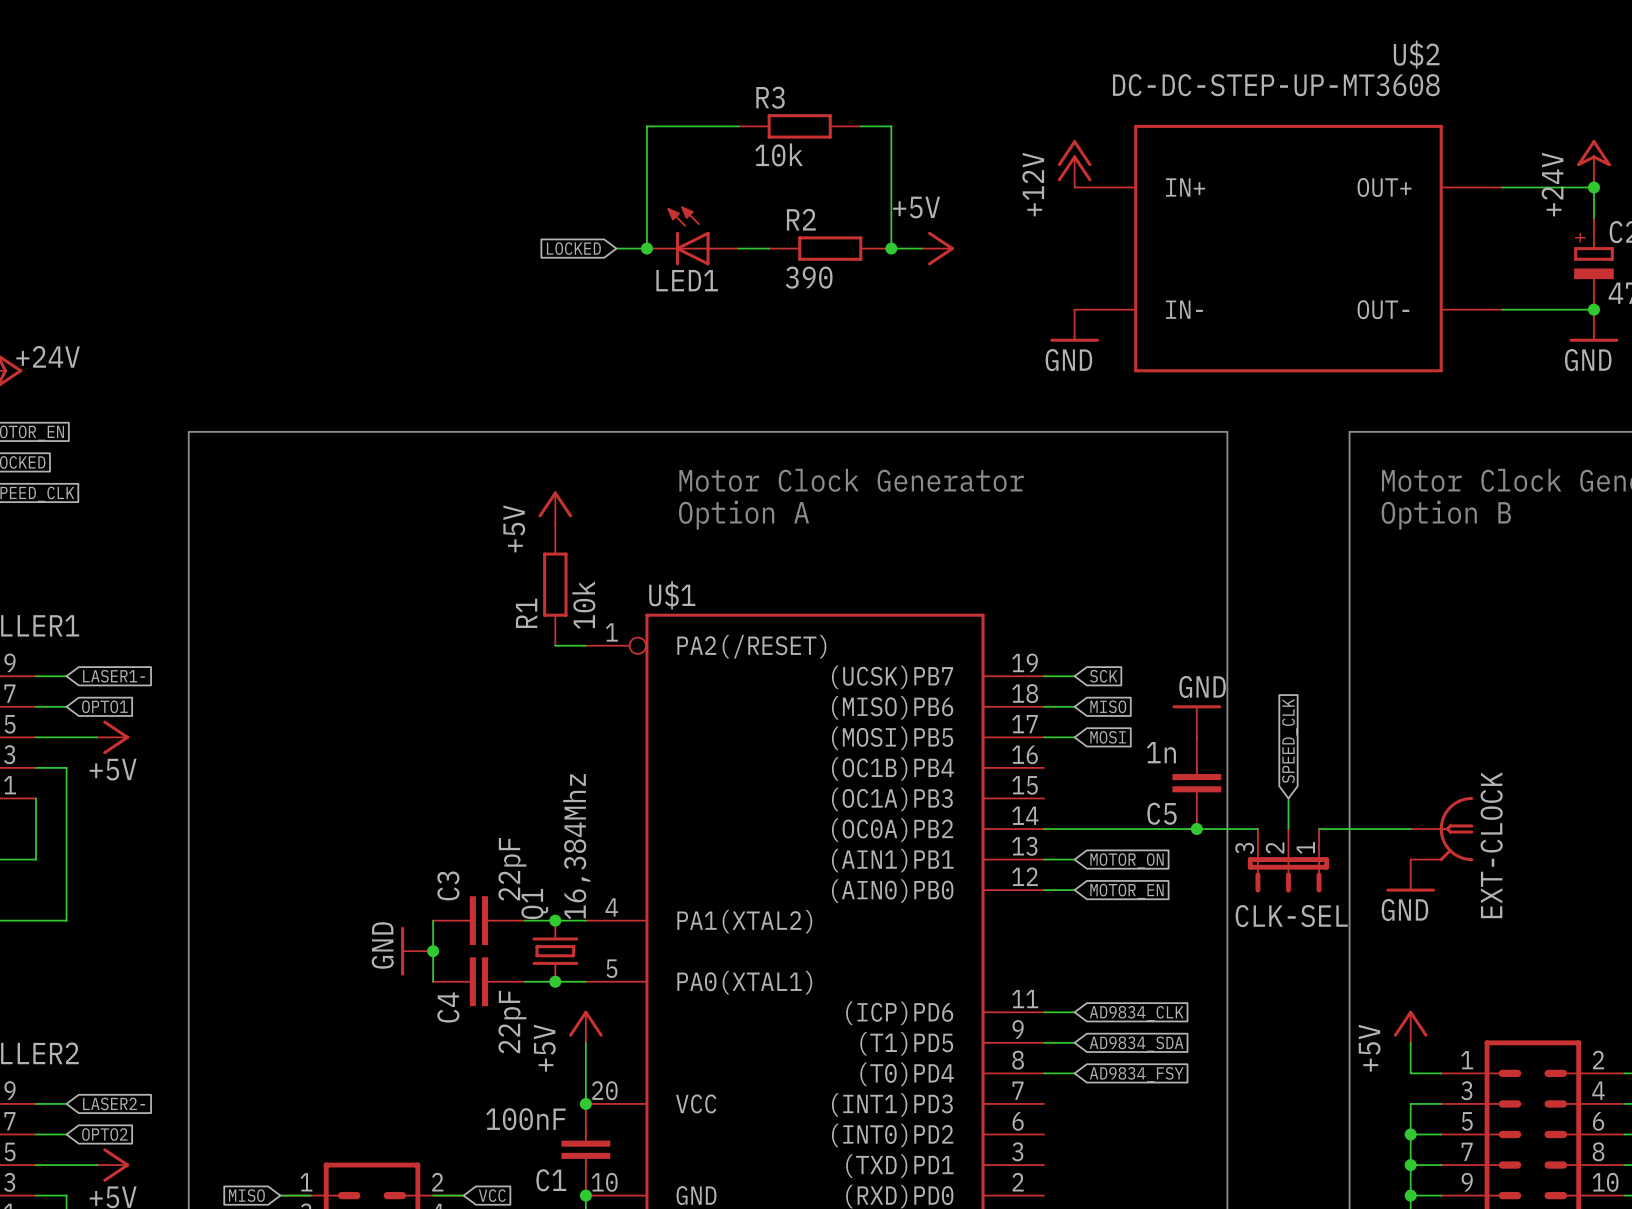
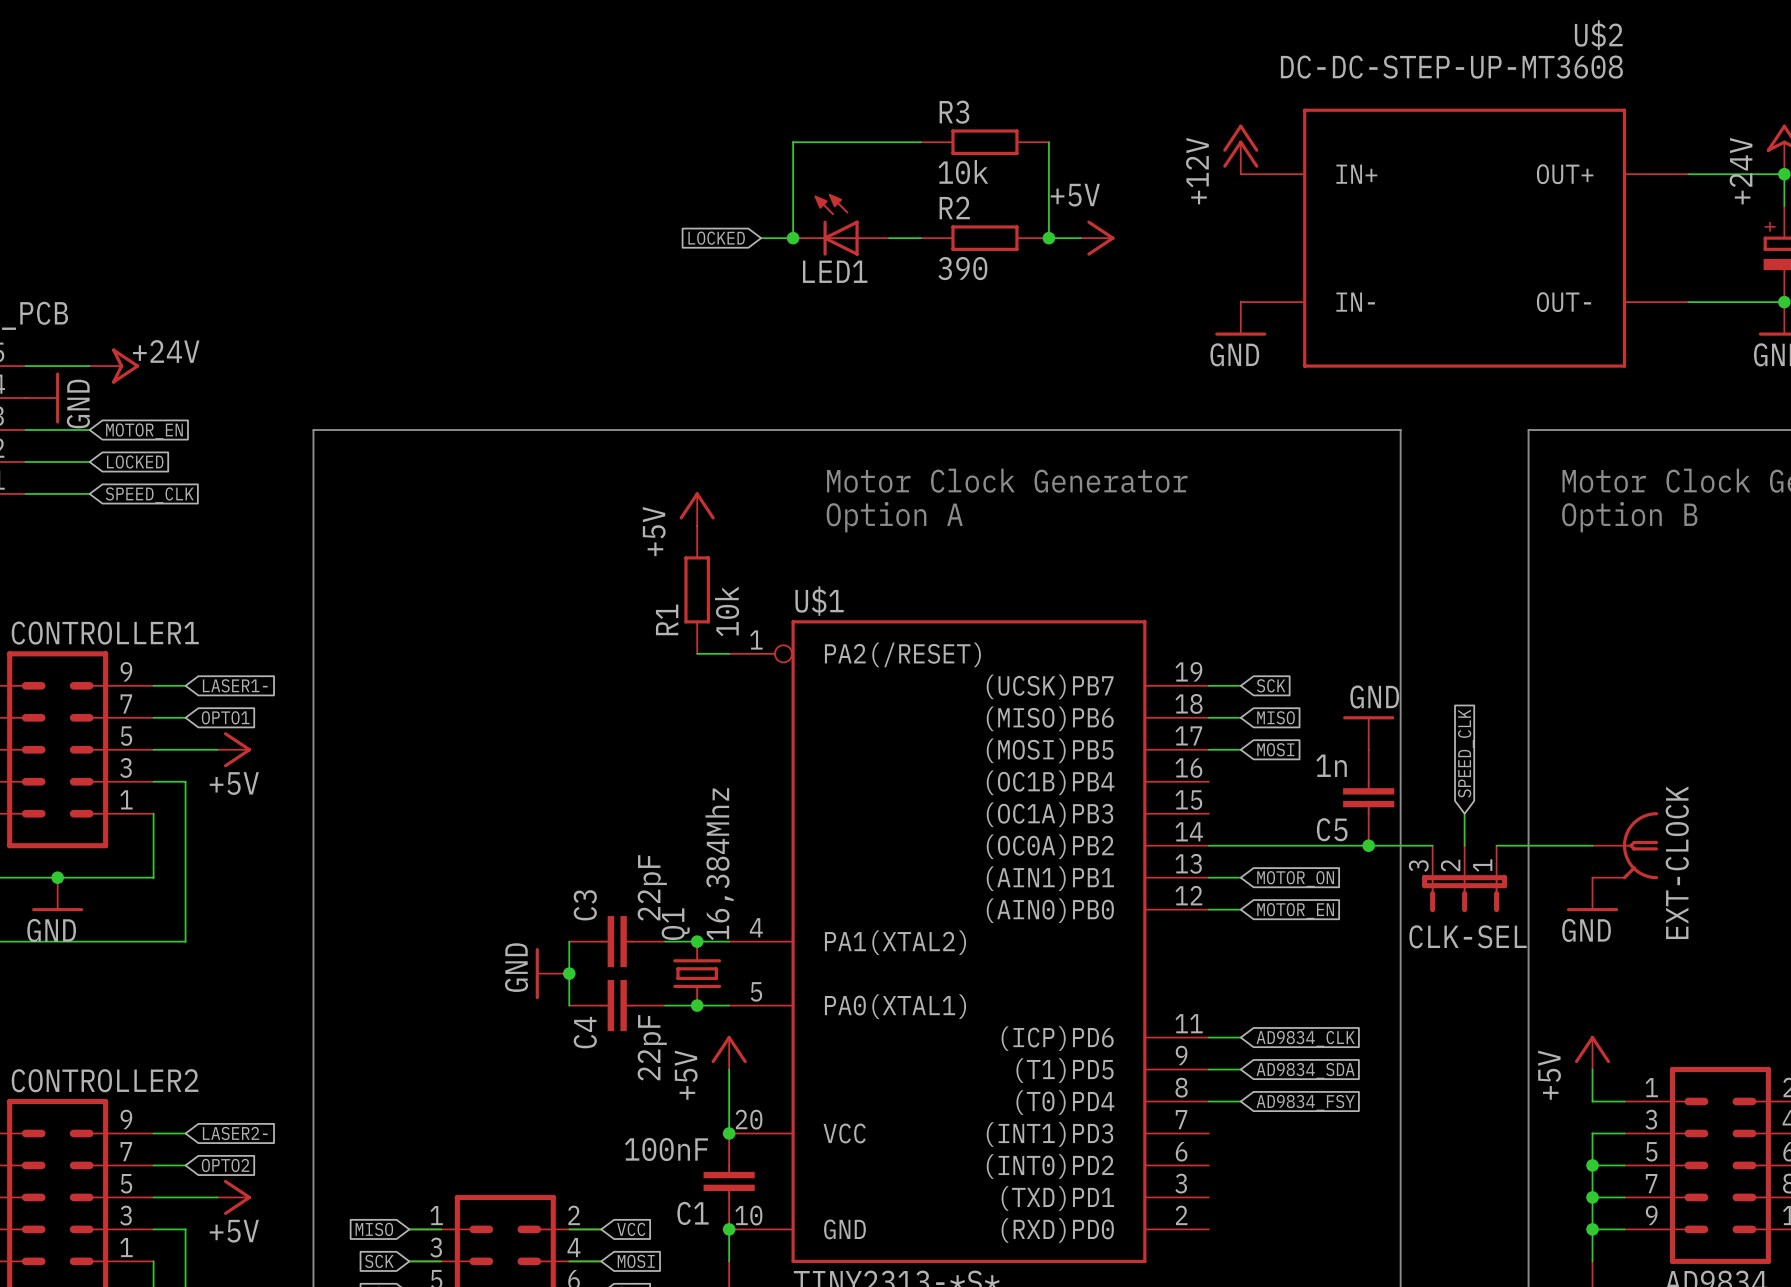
wire: (738, 126) (646, 126) (646, 156) -> (921, 142) (793, 142)
R3 position: (799, 126) -> (984, 142)
wire: (860, 126) (891, 126) (891, 156) -> none

